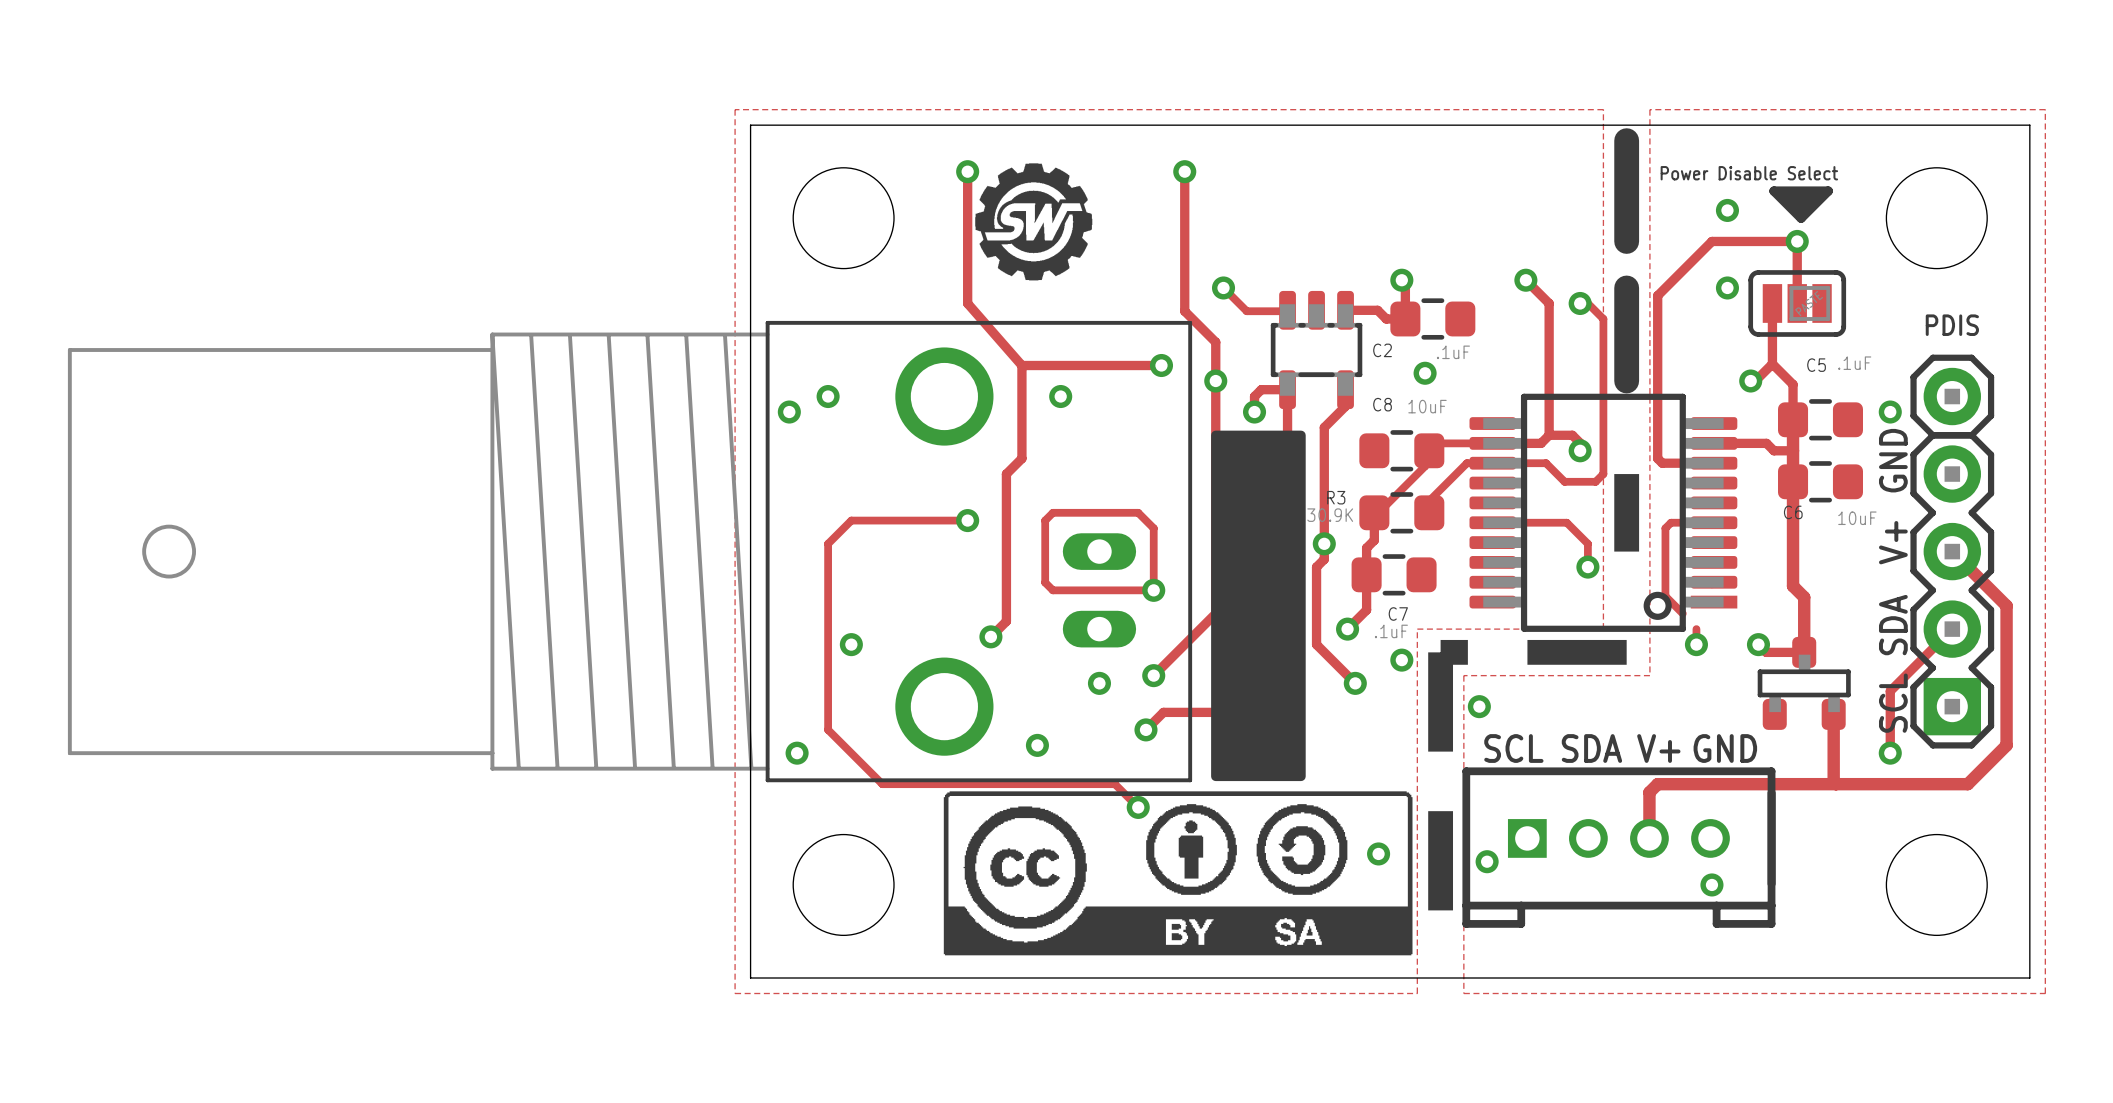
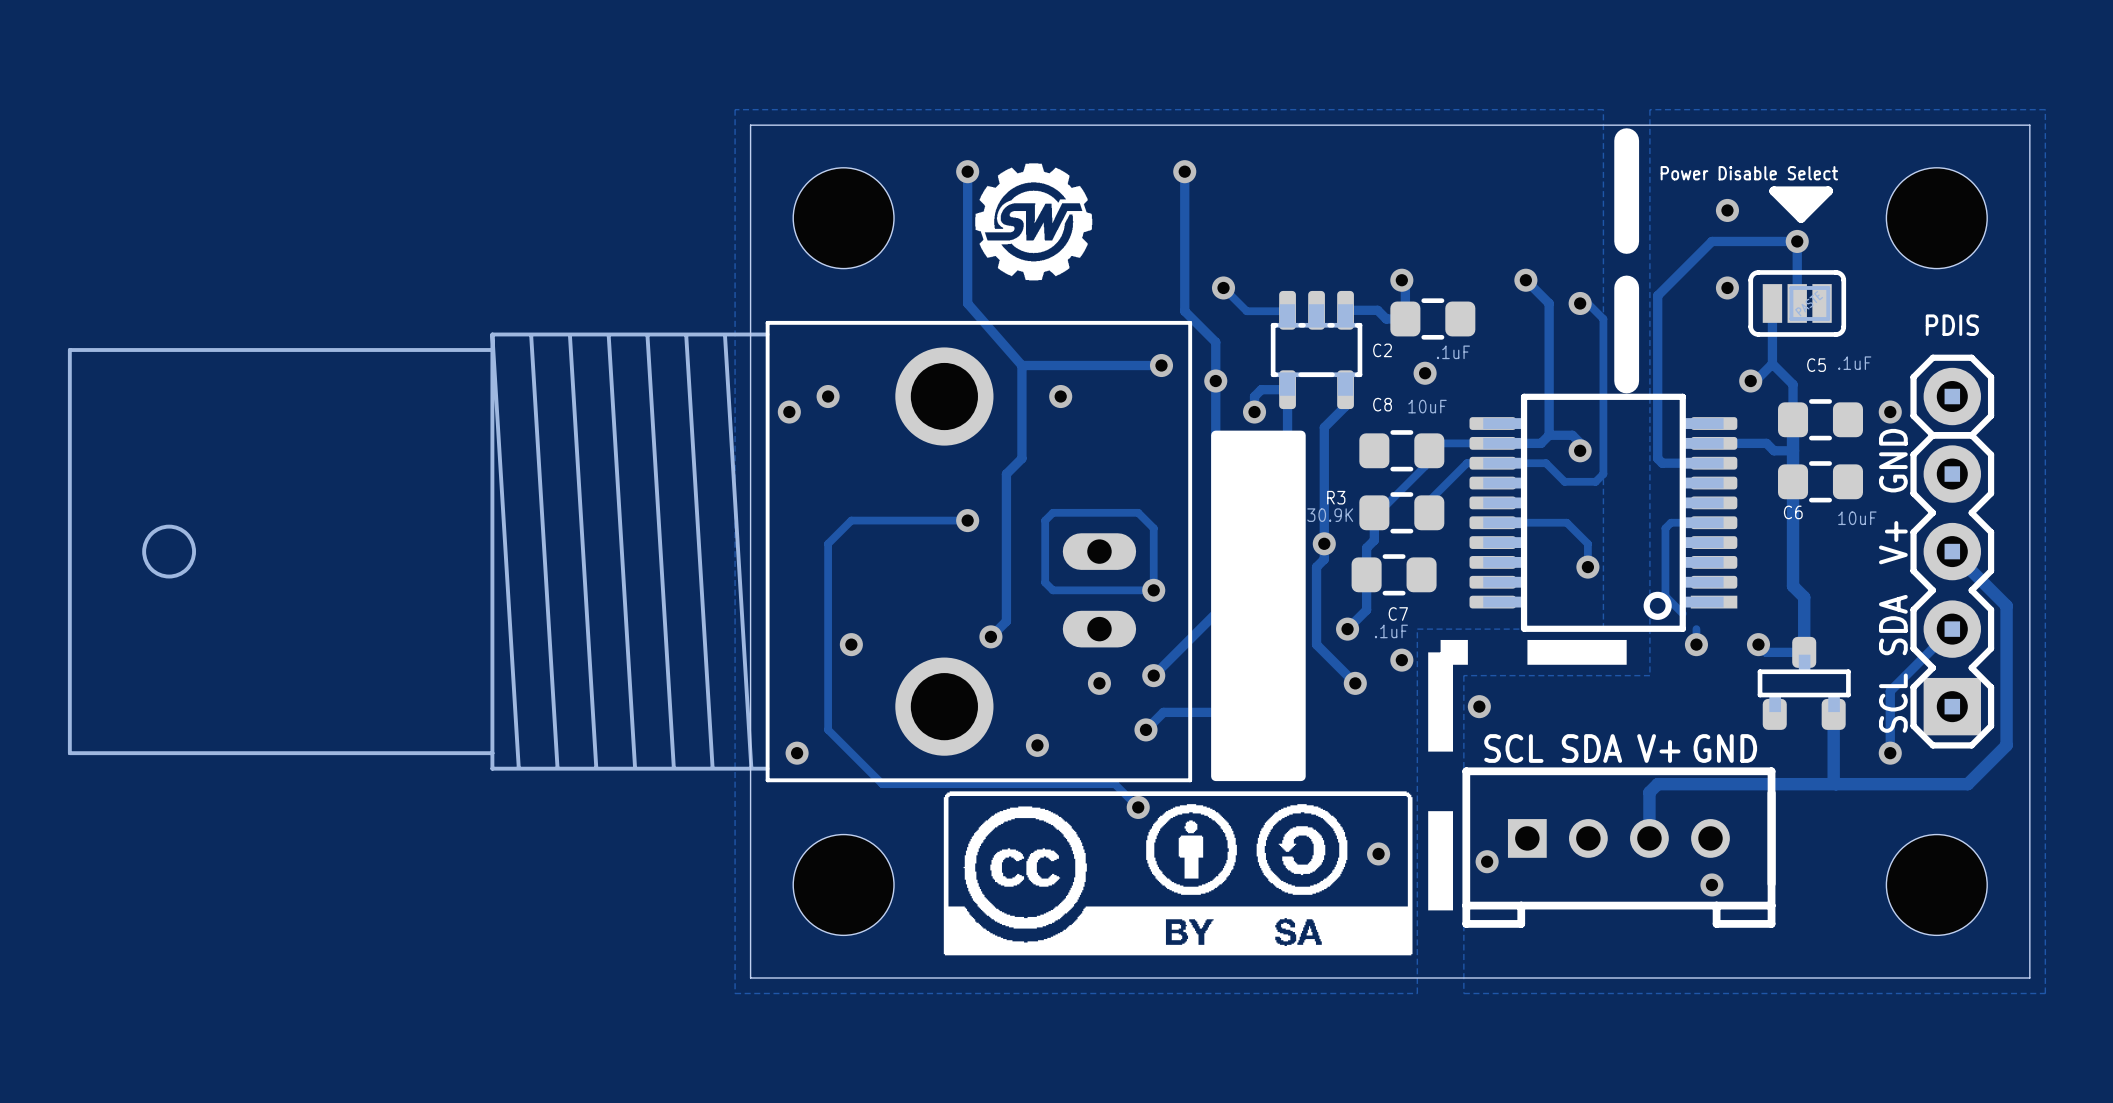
line: (1626, 474) (1626, 551) -> none

